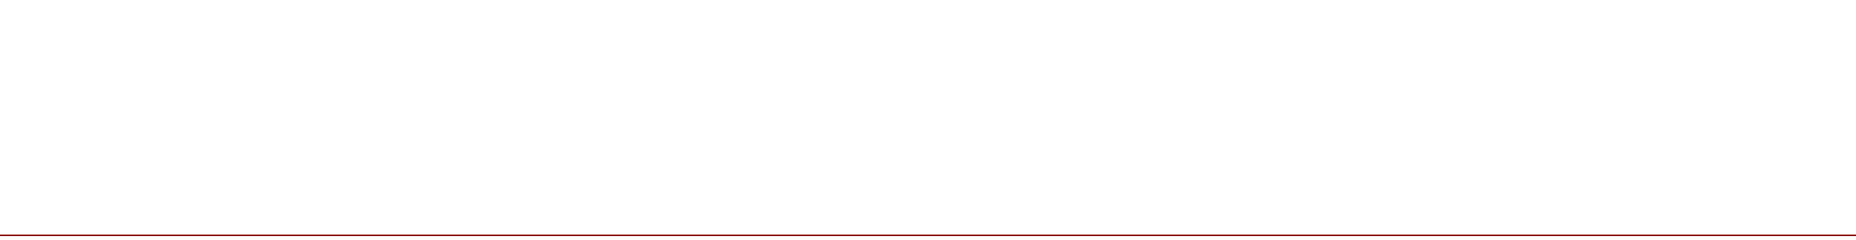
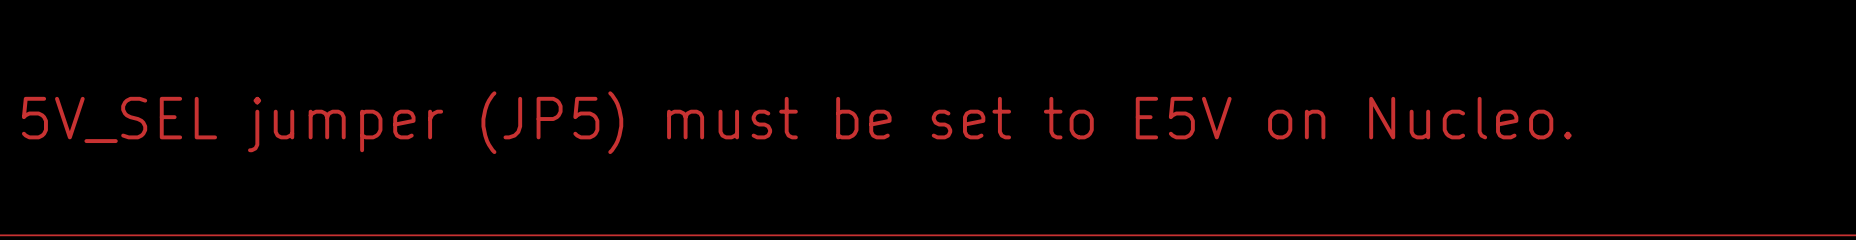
title block: none -> 5V_SEL jumper (JP5) must be set to E5V on Nucleo. (796, 122)

